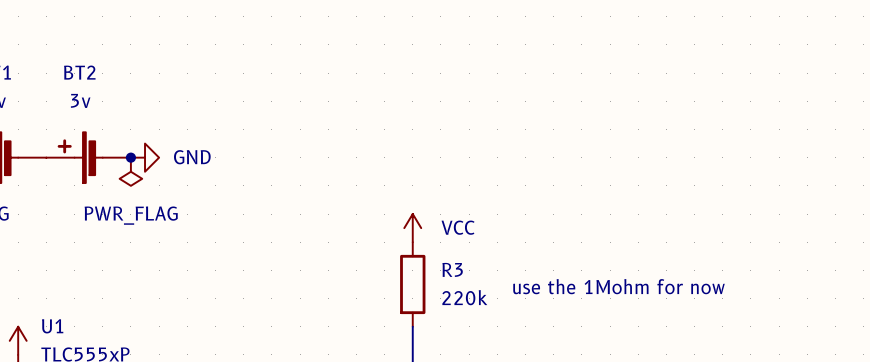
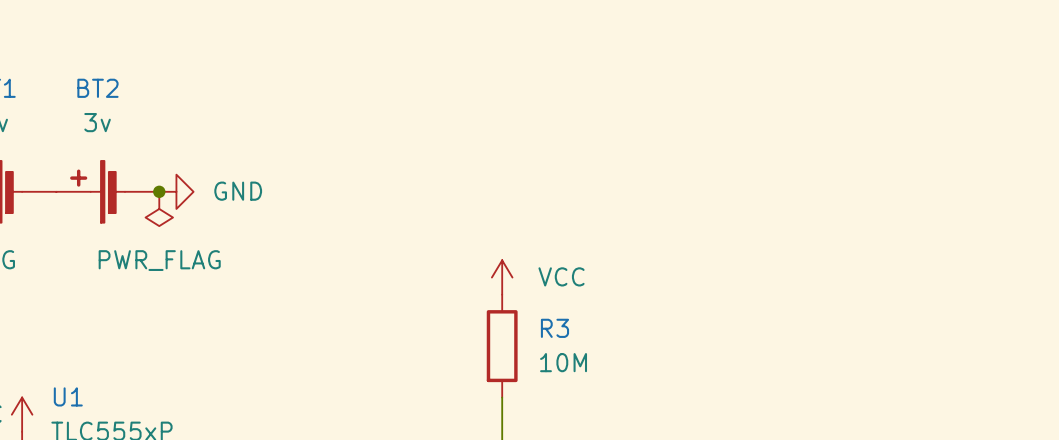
text: use the 1Mohm for now (619, 286) -> none
R3 value: 220k (464, 297) -> 10M (563, 362)

